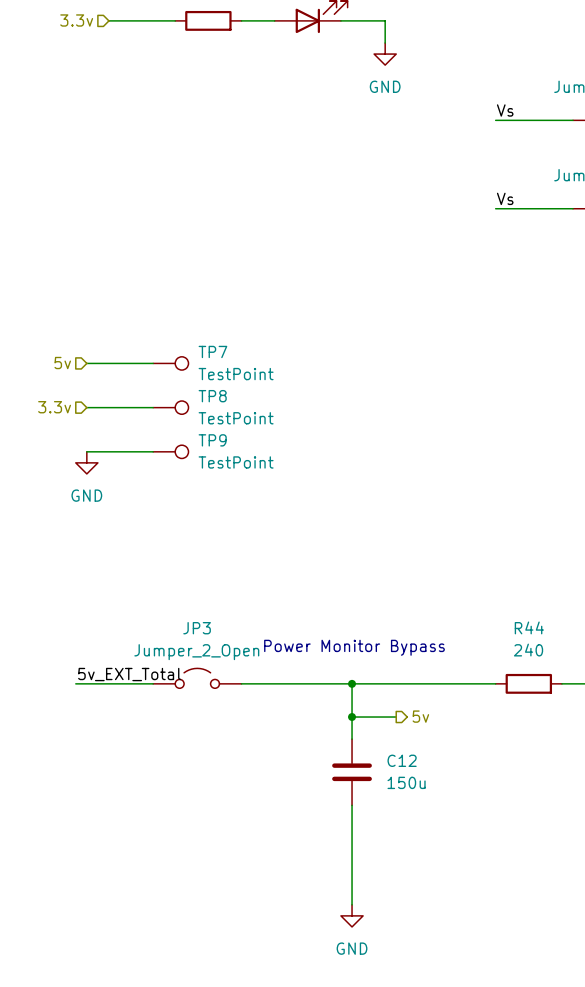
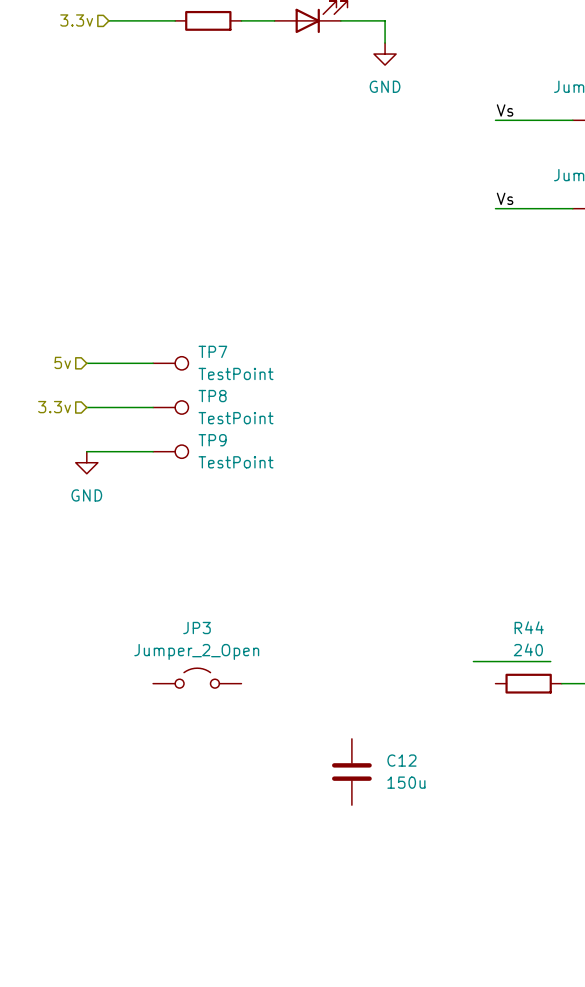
text: Power Monitor Bypass (354, 647) -> none
wire: none -> (473, 661) (550, 661)
label: 5v_EXT_Total (129, 674) -> none
wire: (75, 683) (153, 683) -> none
wire: (241, 683) (495, 683) -> none
wire: (352, 683) (352, 739) -> none
junction: (352, 683) -> none
hierarchical label: 5v (420, 716) -> none
wire: (352, 717) (396, 717) -> none
junction: (352, 717) -> none
wire: (352, 805) (352, 904) -> none
power symbol: GND (352, 915) -> none

